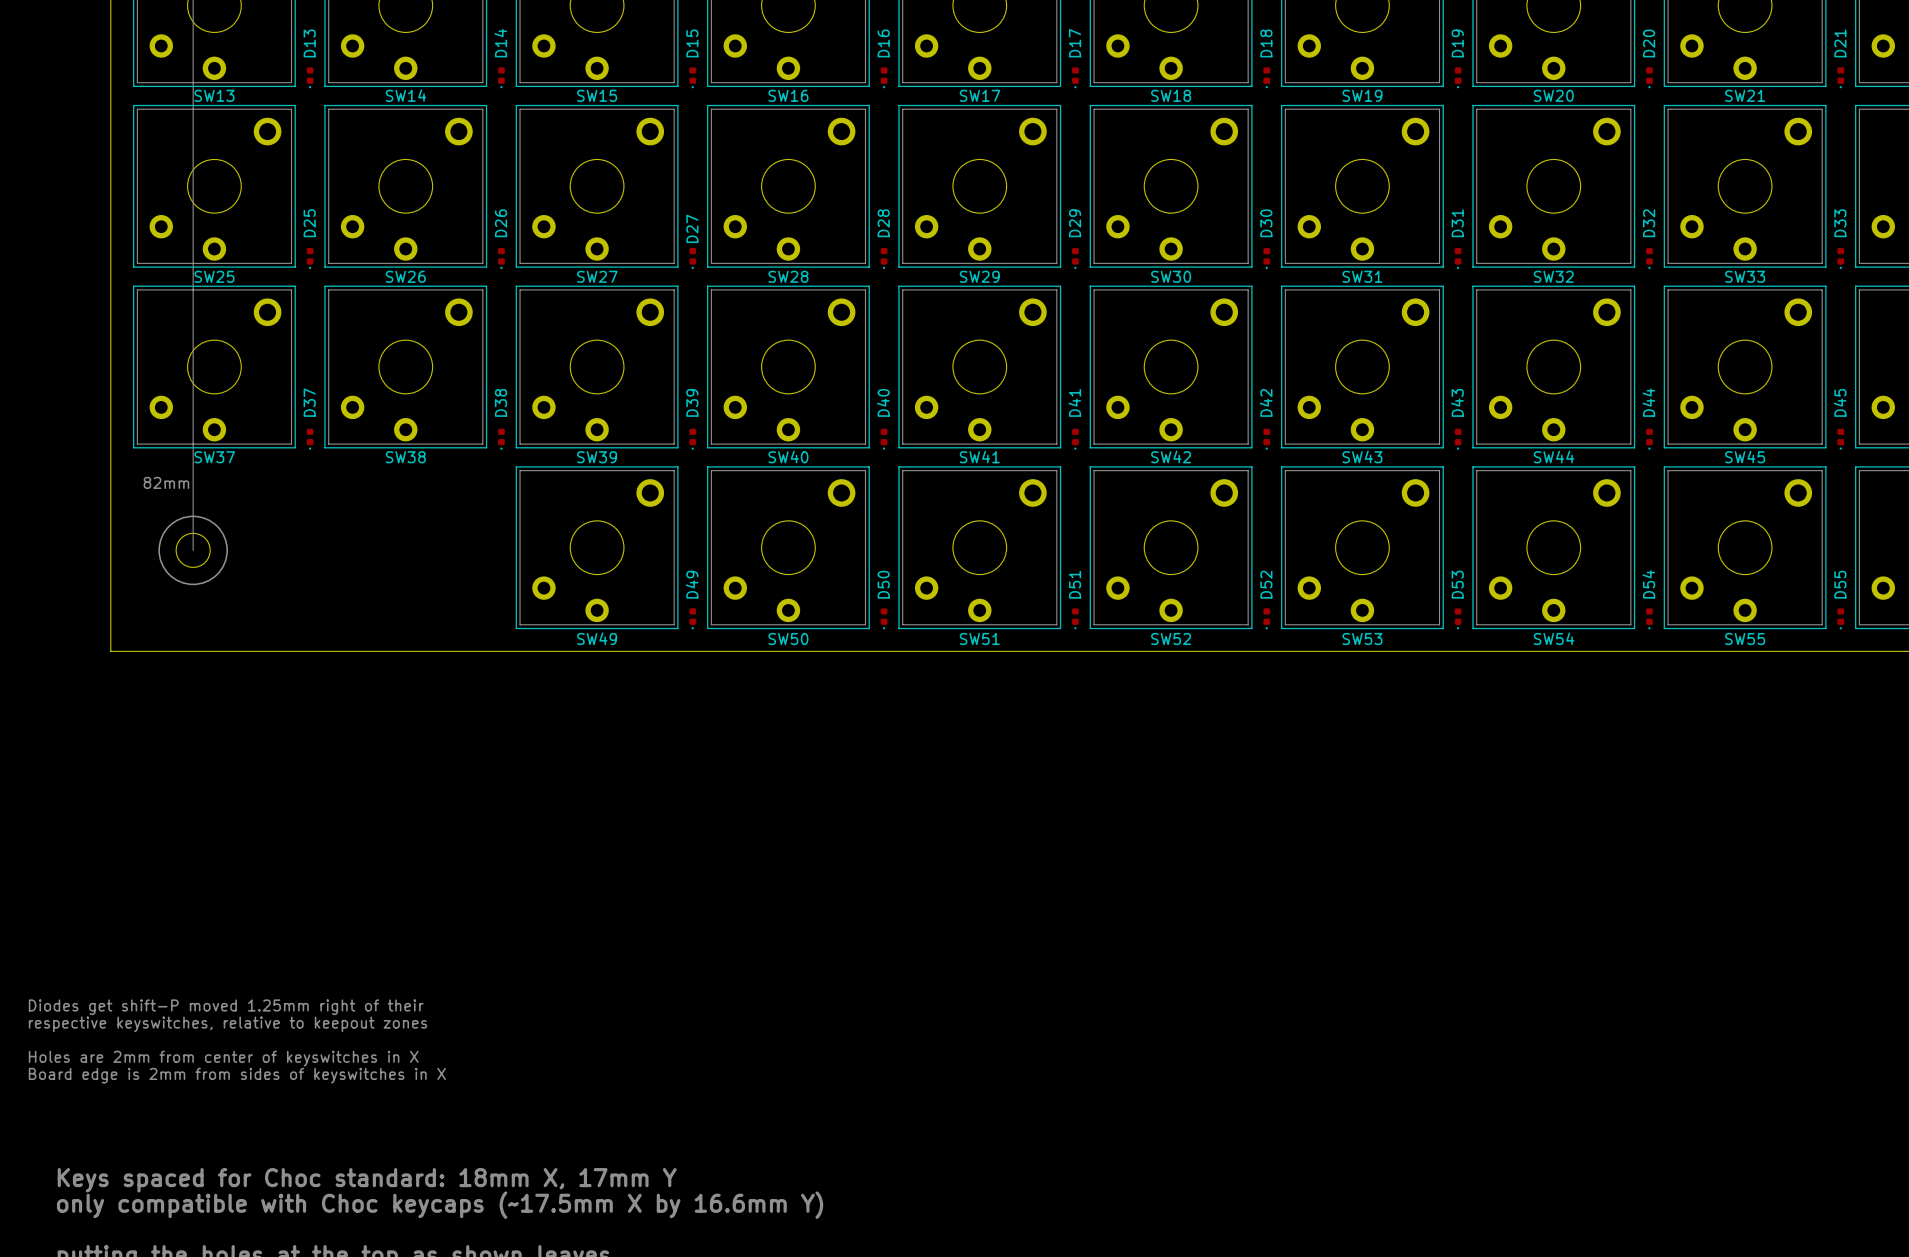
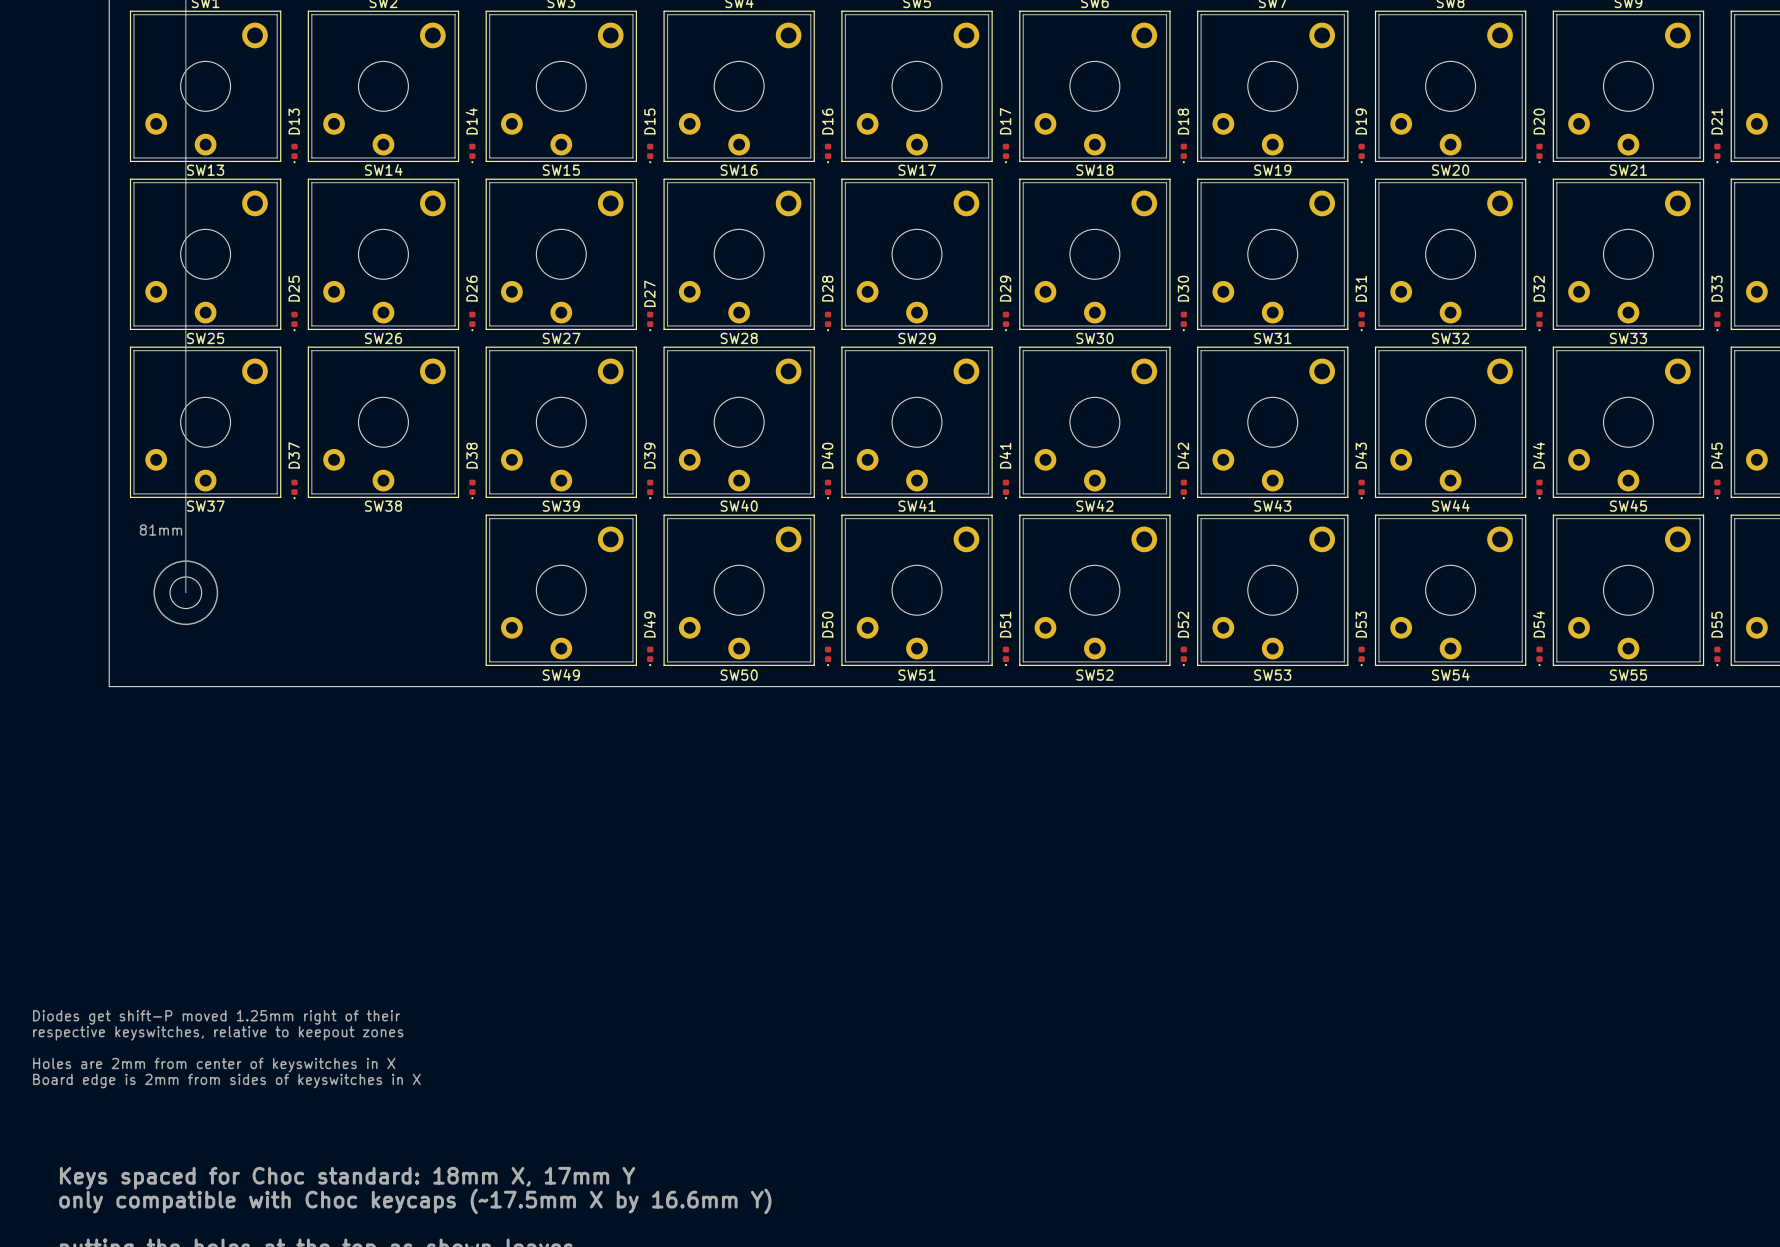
text: 82mm (166, 482) -> 81mm (160, 530)

